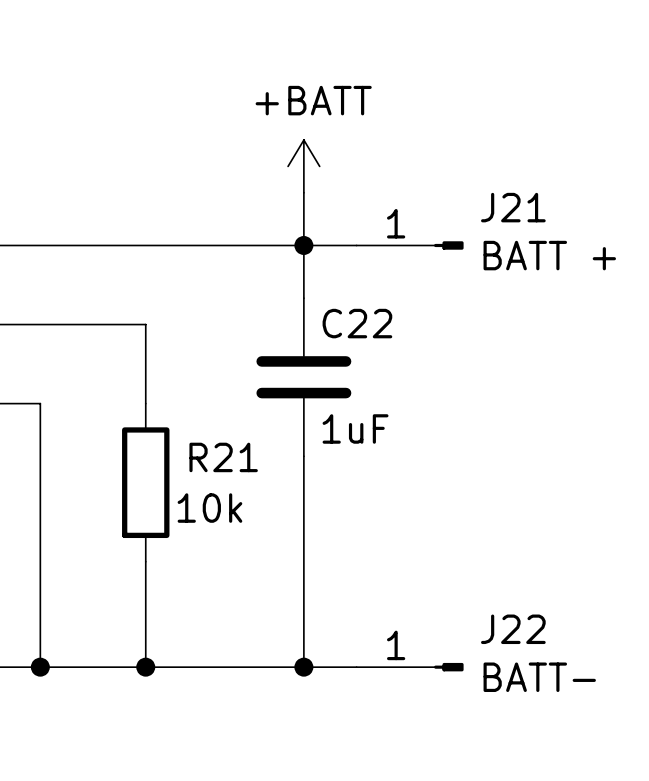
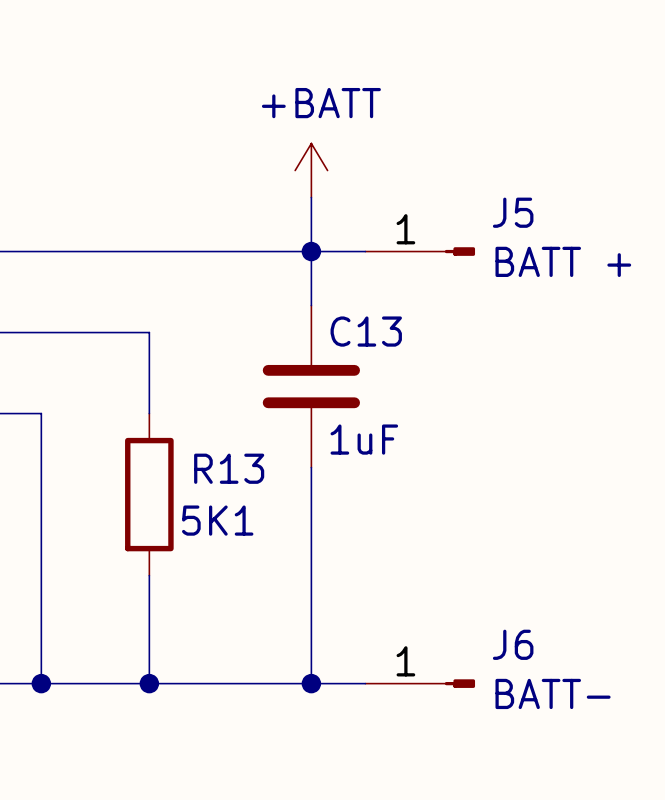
J21 name: J21 (513, 207) -> J5 (513, 212)
C22 name: C22 (357, 323) -> C13 (366, 331)
R21 name: R21 (223, 457) -> R13 (229, 468)
R21 value: 10k (209, 508) -> 5K1 (217, 520)
J22 name: J22 (513, 629) -> J6 (513, 644)

